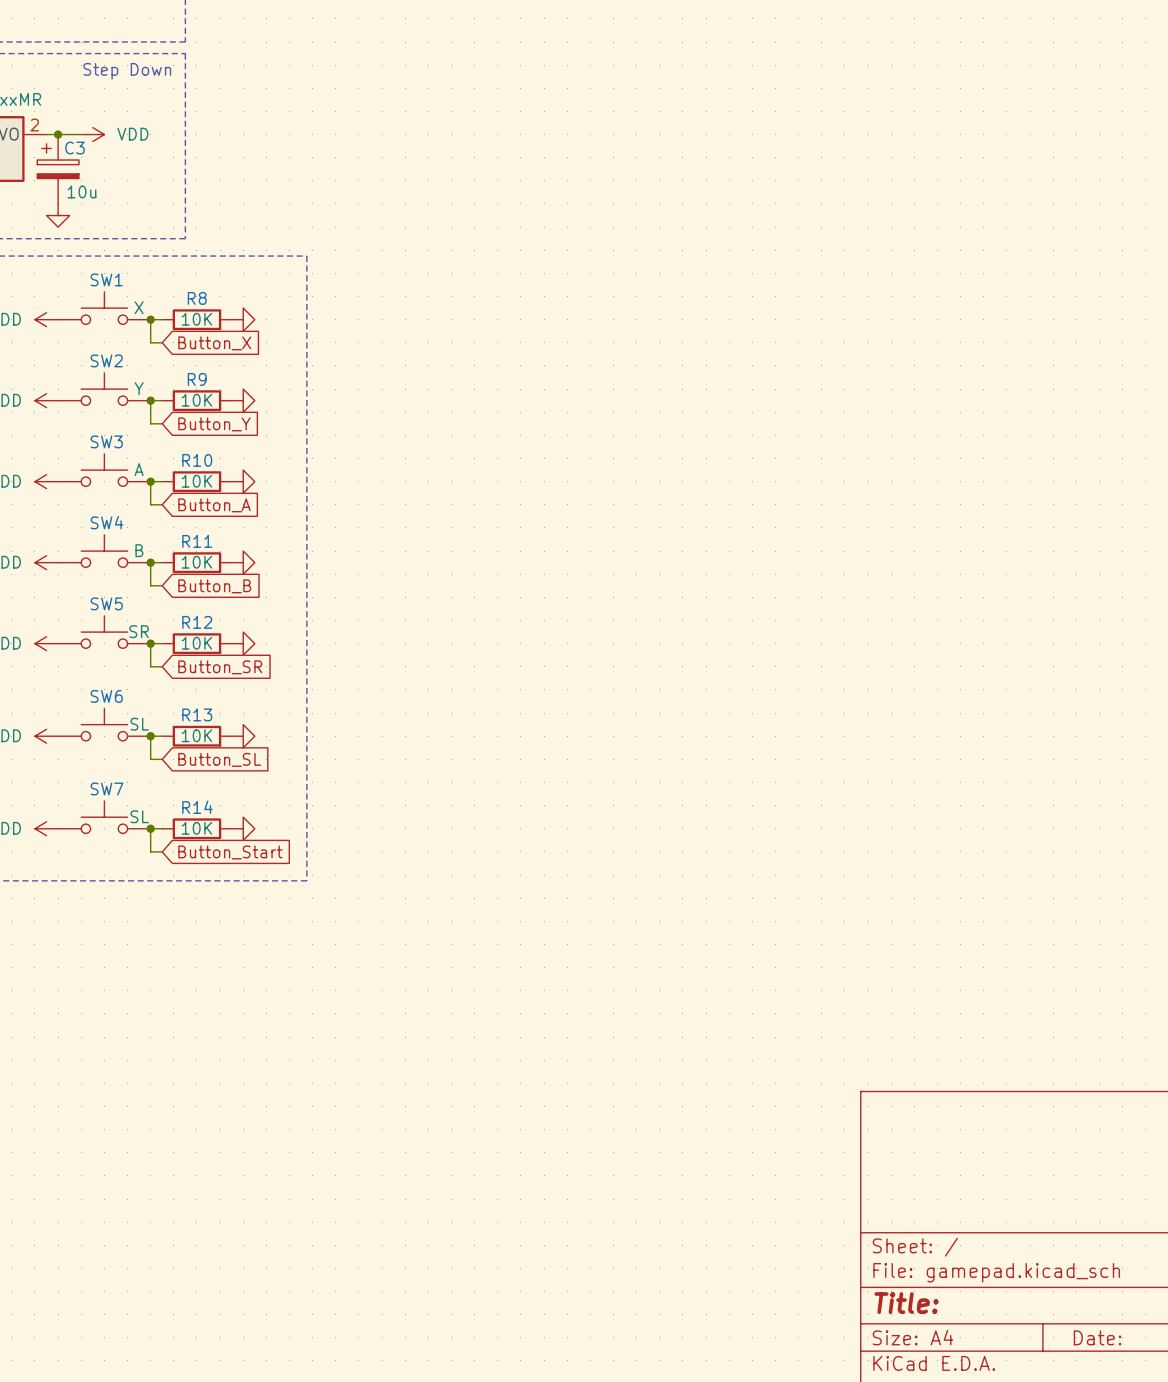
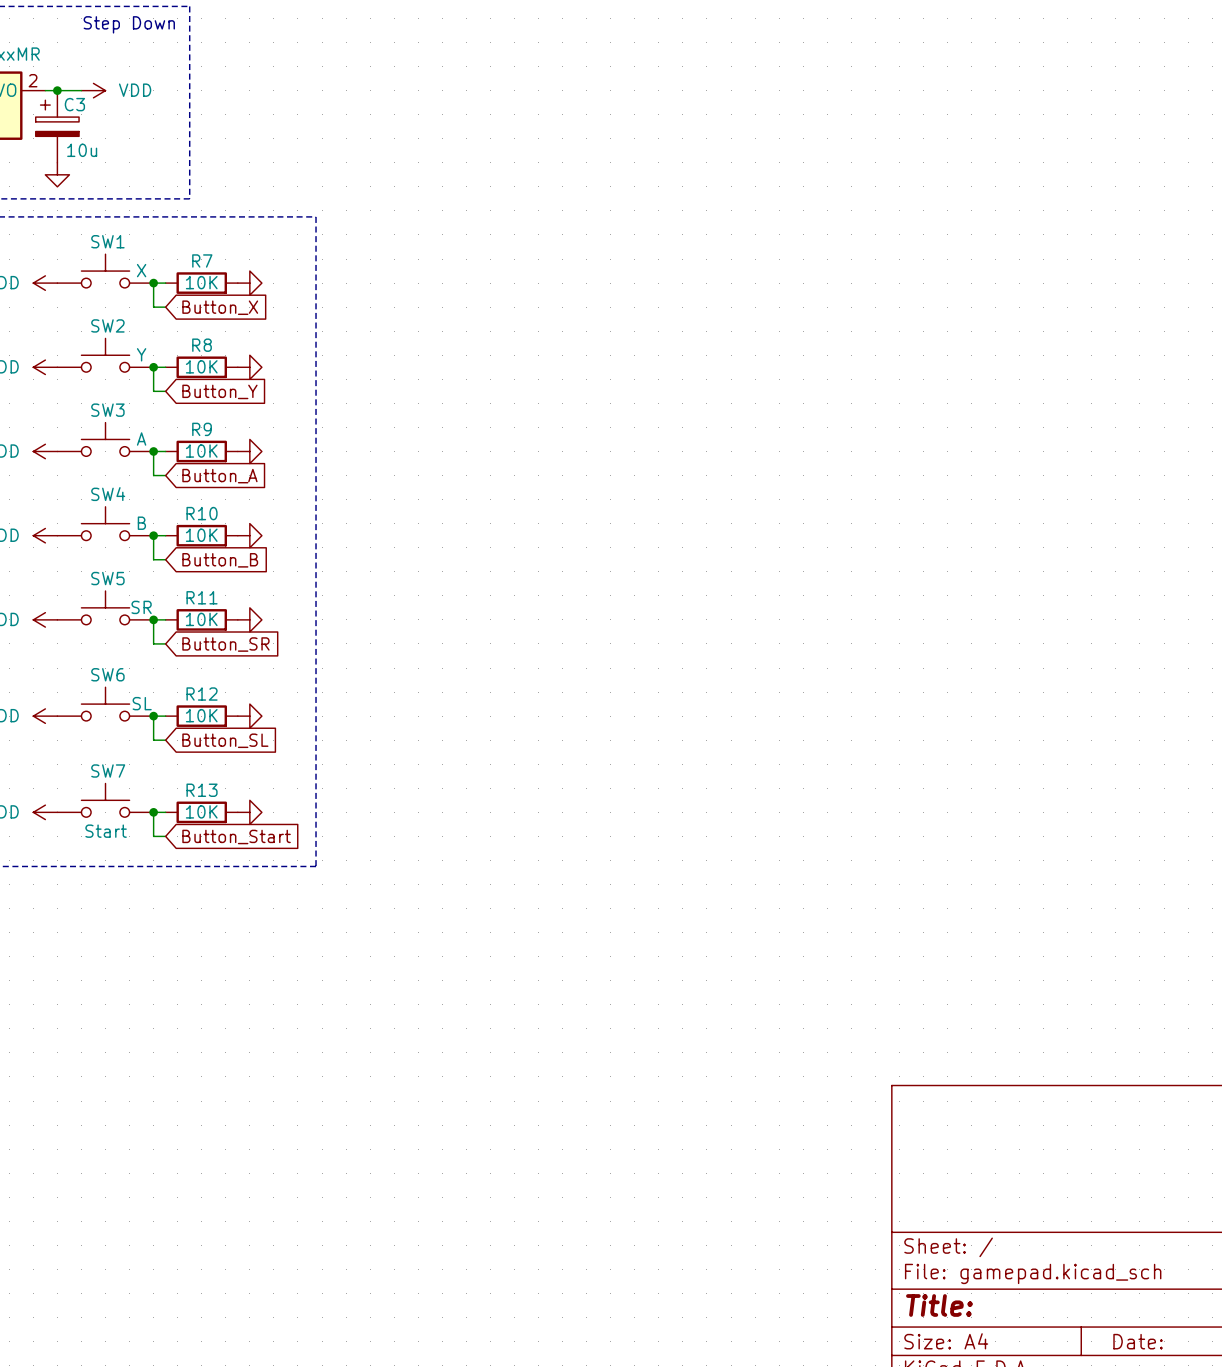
R8 name: R8 (197, 298) -> R7 (202, 260)
R9 name: R9 (197, 379) -> R8 (202, 345)
R10 name: R10 (197, 460) -> R9 (202, 429)
R11 name: R11 (197, 541) -> R10 (202, 513)
R12 name: R12 (197, 622) -> R11 (202, 597)
R13 name: R13 (197, 714) -> R12 (202, 694)
R14 name: R14 (197, 807) -> R13 (202, 790)
SW7 value: SL (139, 816) -> Start (106, 831)

